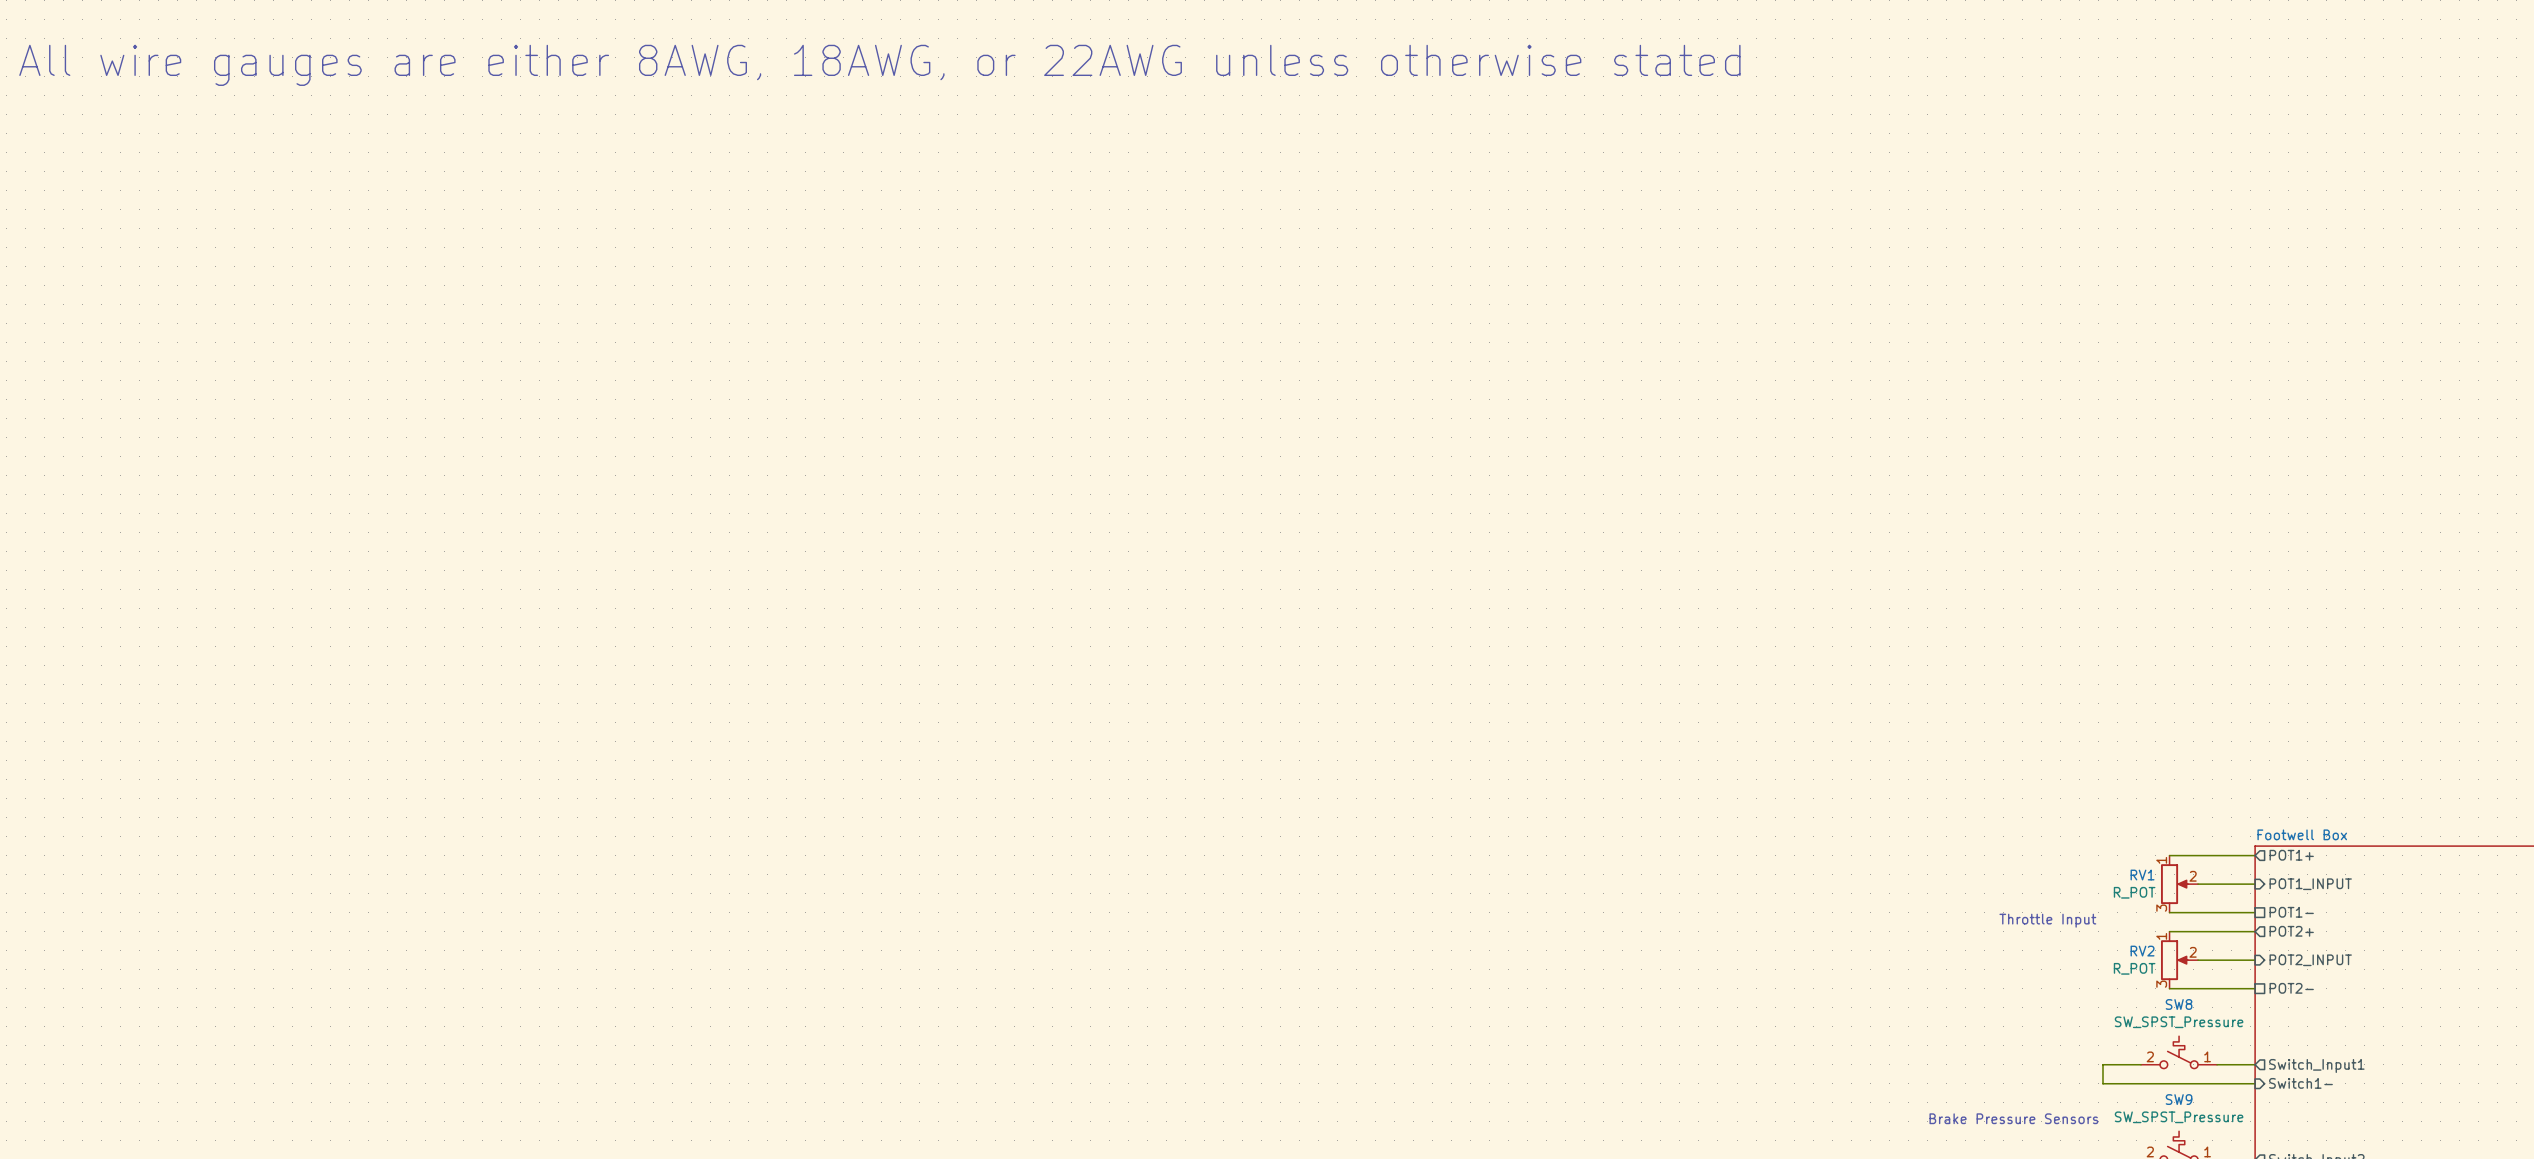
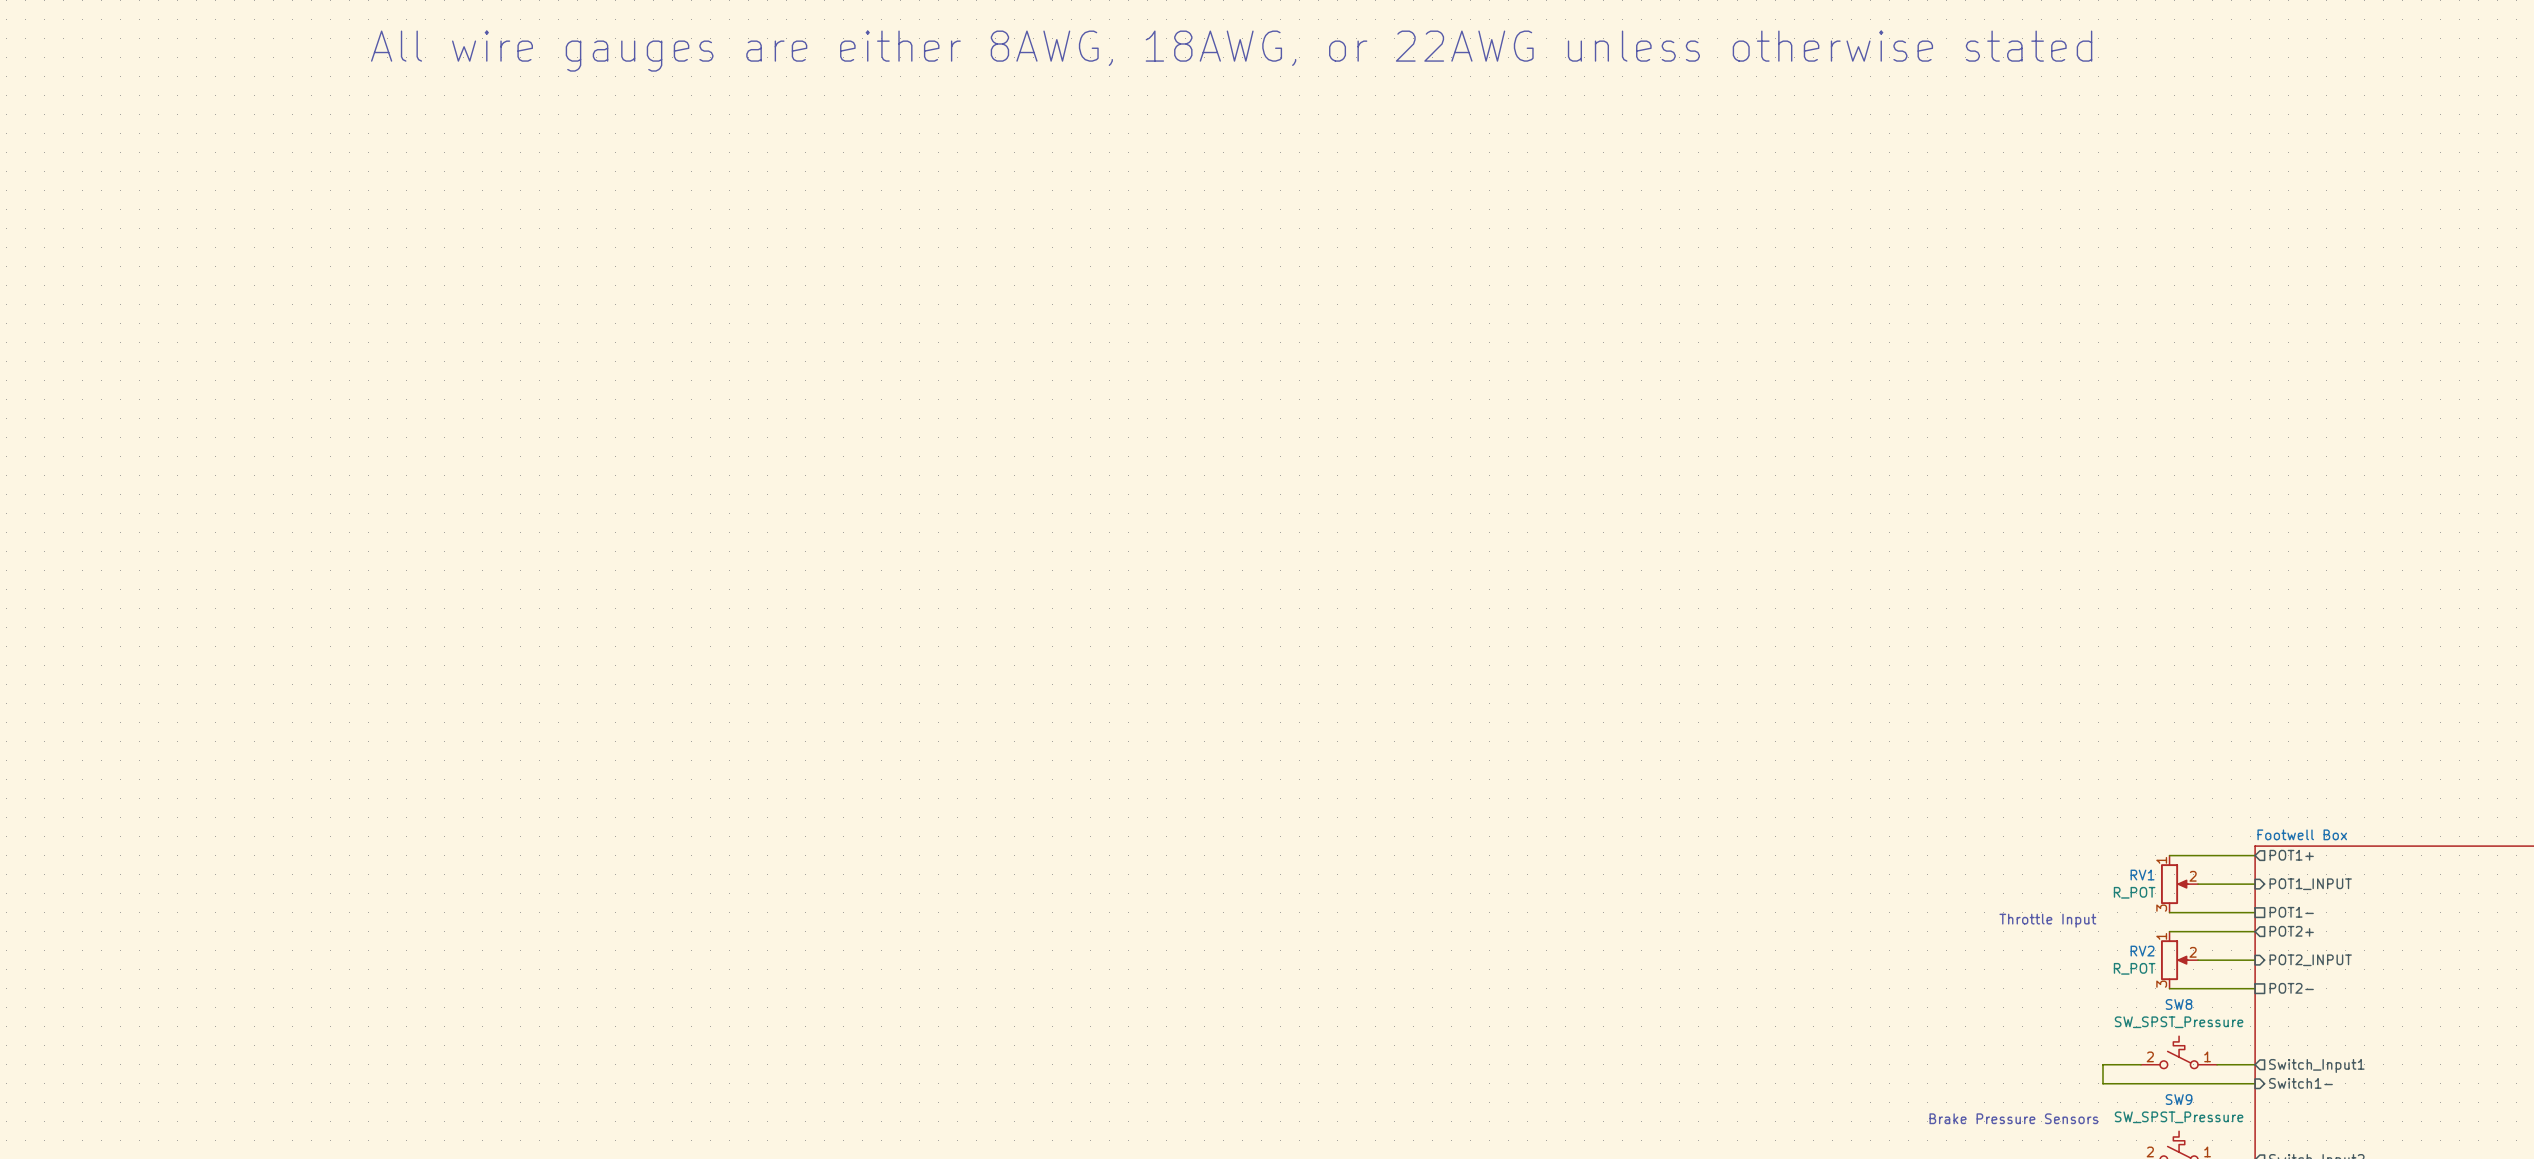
text: none -> All wire gauges are either 8AWG, 18AWG, or 22AWG unless otherwise stated (1231, 51)
text: All wire gauges are either 8AWG, 18AWG, or 22AWG unless otherwise stated (879, 65) -> none

